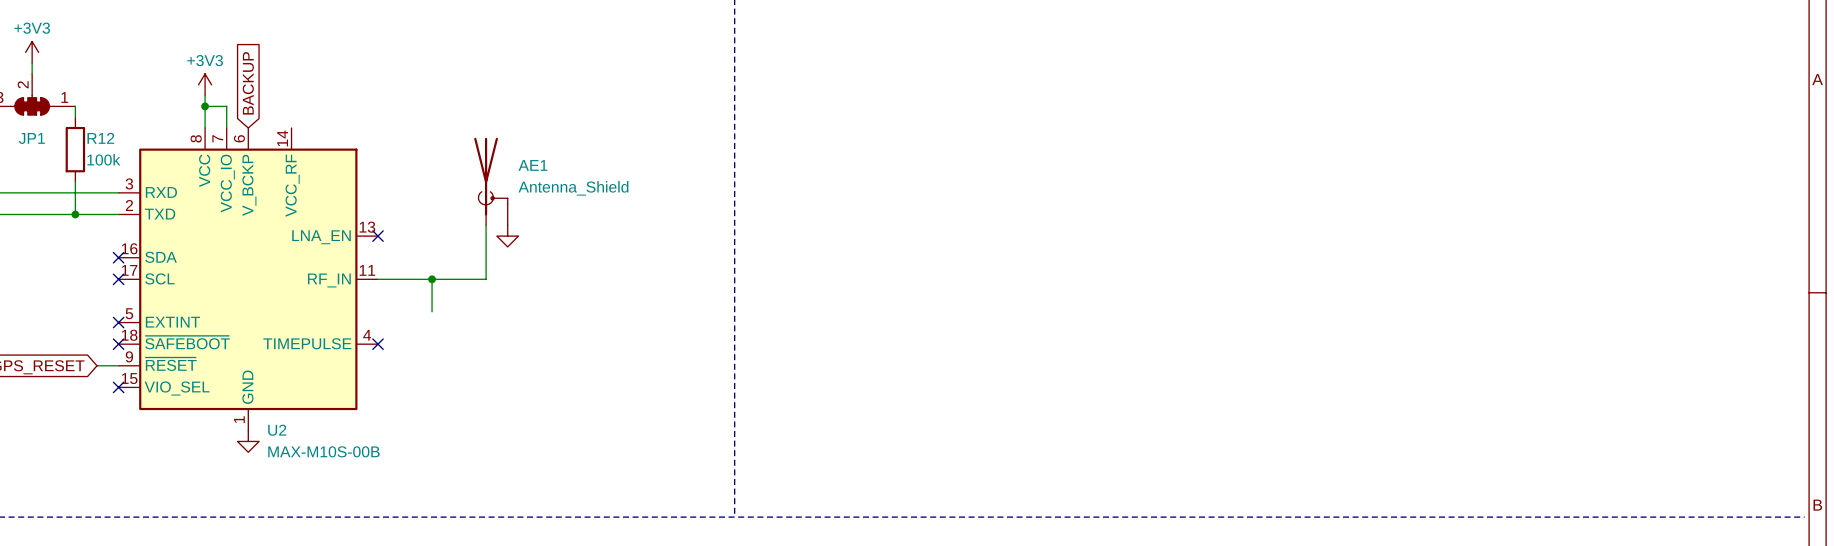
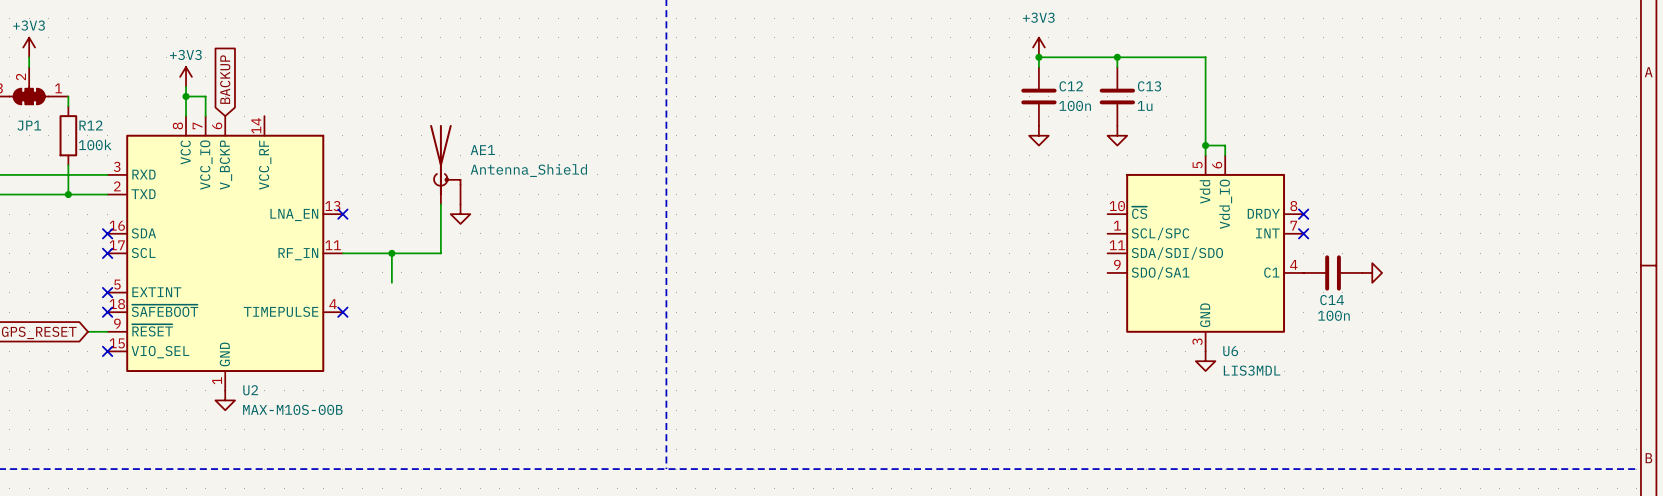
power symbol: none -> +3V3 (1038, 47)
junction: none -> (1038, 57)
wire: none -> (1117, 57) (1117, 67)
junction: none -> (1117, 57)
wire: none -> (1038, 67) (1038, 57) (1205, 57) (1205, 155)
C12: none -> 100n (1038, 96)
C13: none -> 1u (1117, 96)
power symbol: none -> (1038, 135)
power symbol: none -> (1117, 135)
wire: none -> (1205, 145) (1225, 145) (1225, 155)
junction: none -> (1205, 145)
no-connect mark: none -> (1303, 214)
no-connect mark: none -> (1303, 233)
U6: none -> LIS3MDL (1205, 253)
C14: none -> 100n (1333, 272)
power symbol: none -> (1372, 272)
power symbol: none -> (1205, 361)

